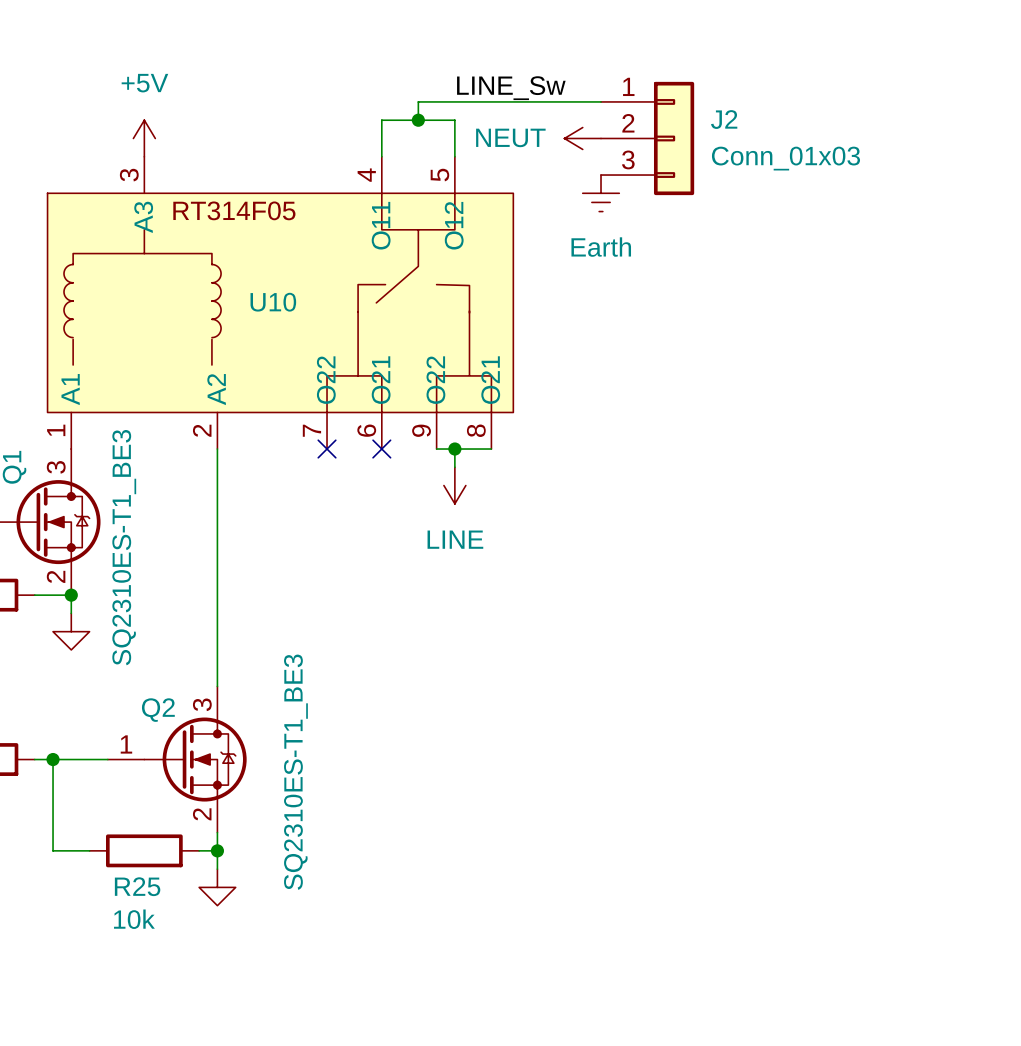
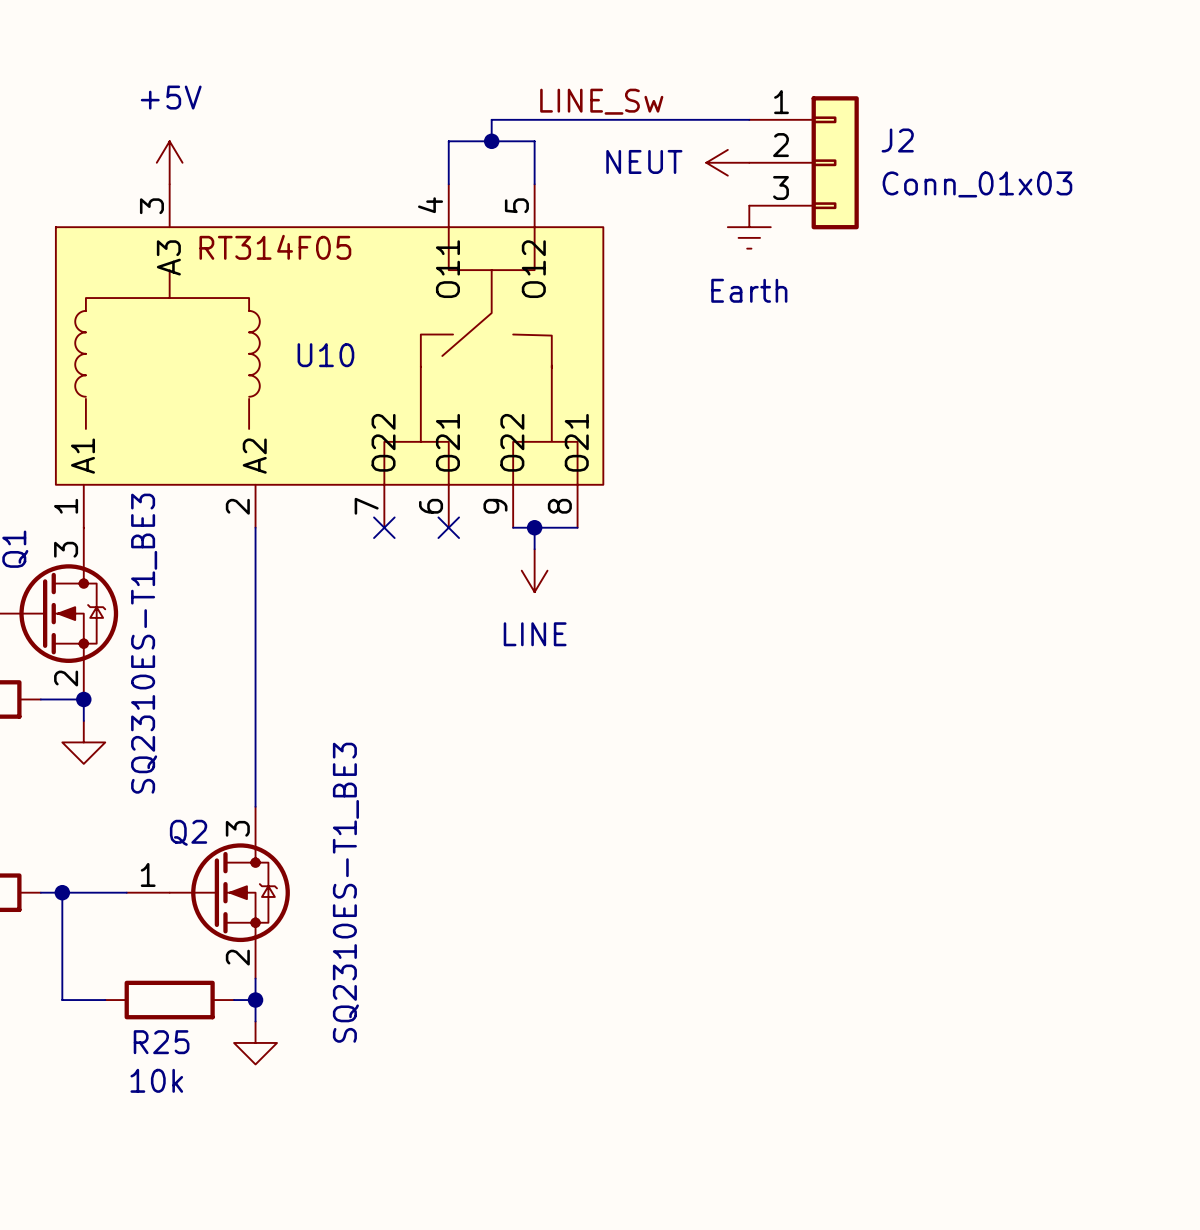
power symbol position: NEUT (582, 138) -> NEUT (727, 162)
J2 position: (647, 138) -> (804, 162)
power symbol position: Earth (601, 193) -> Earth (749, 227)

